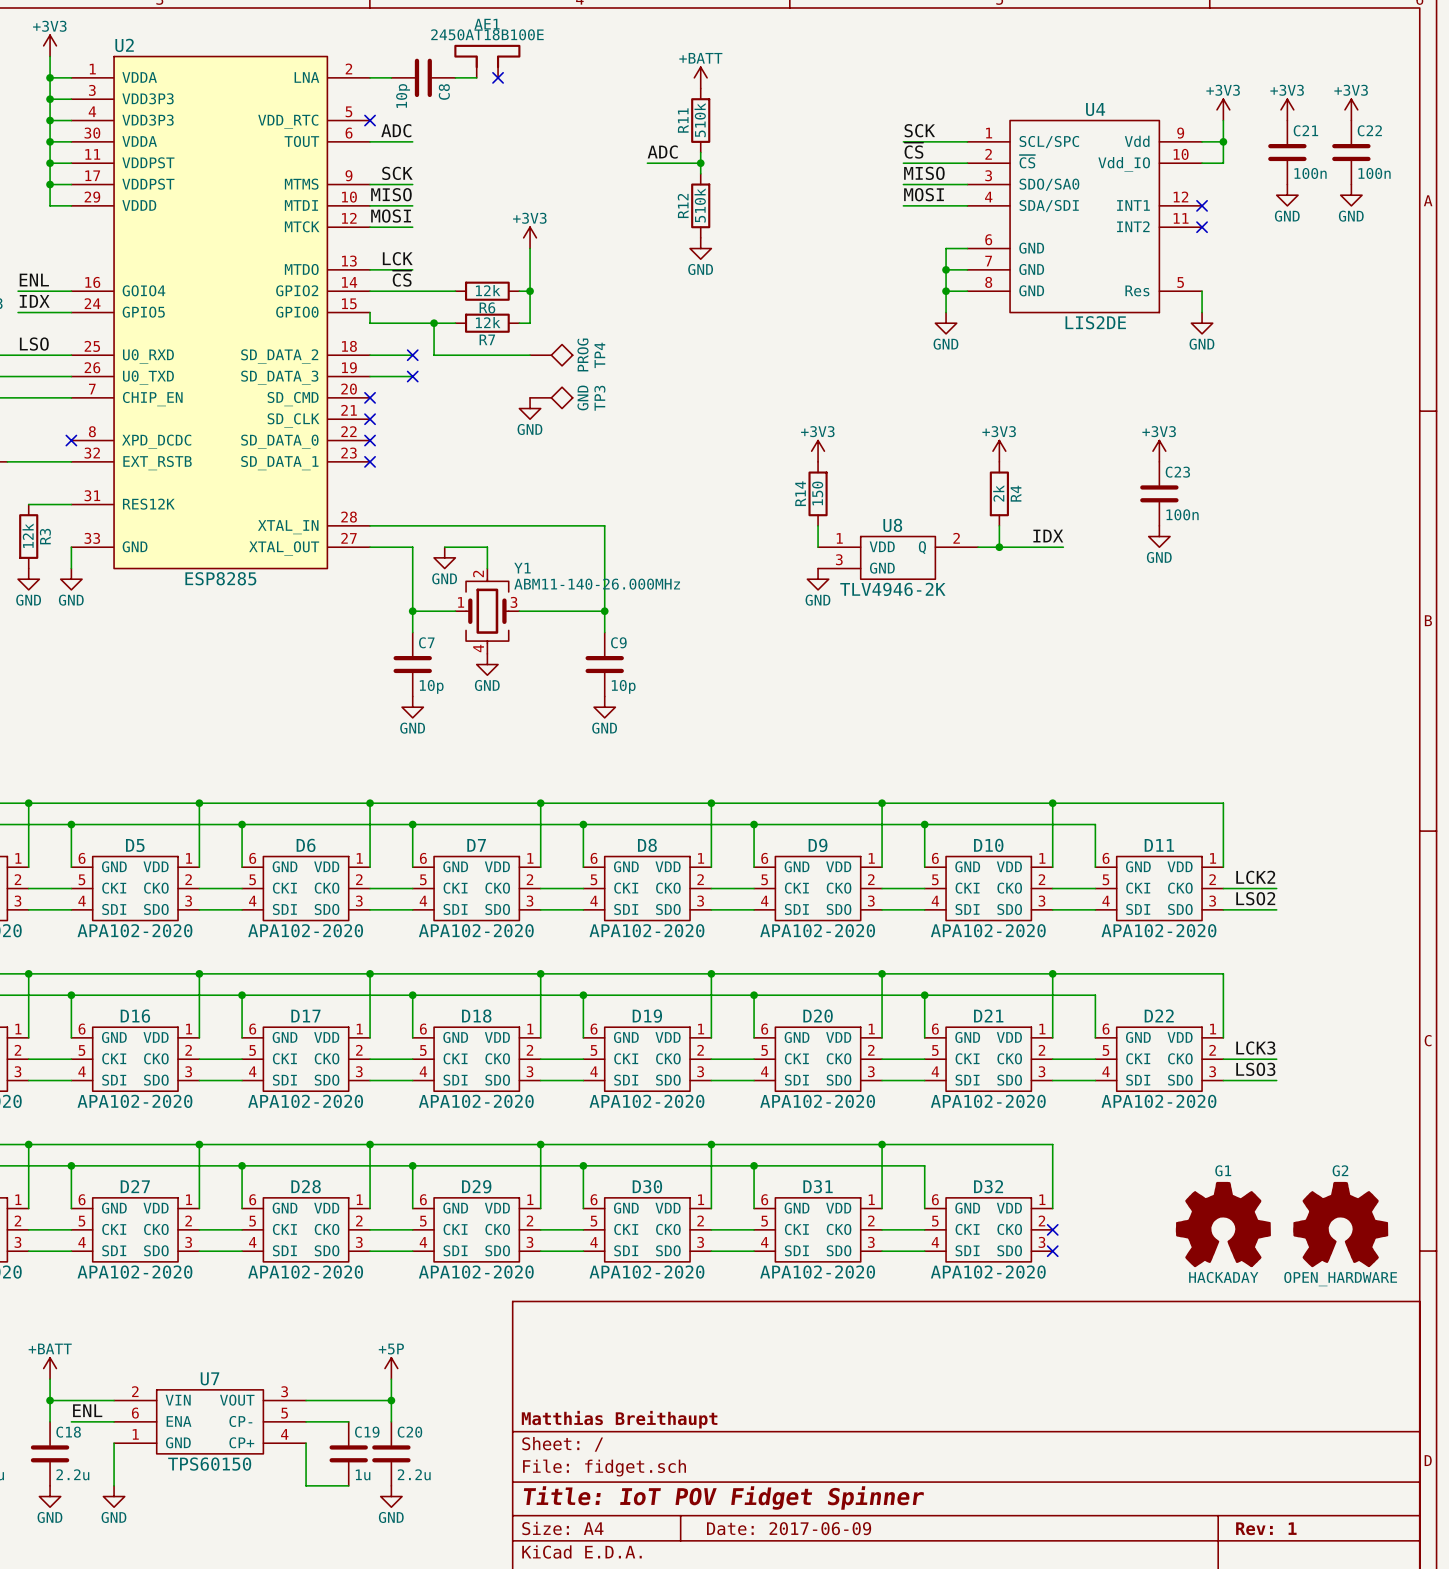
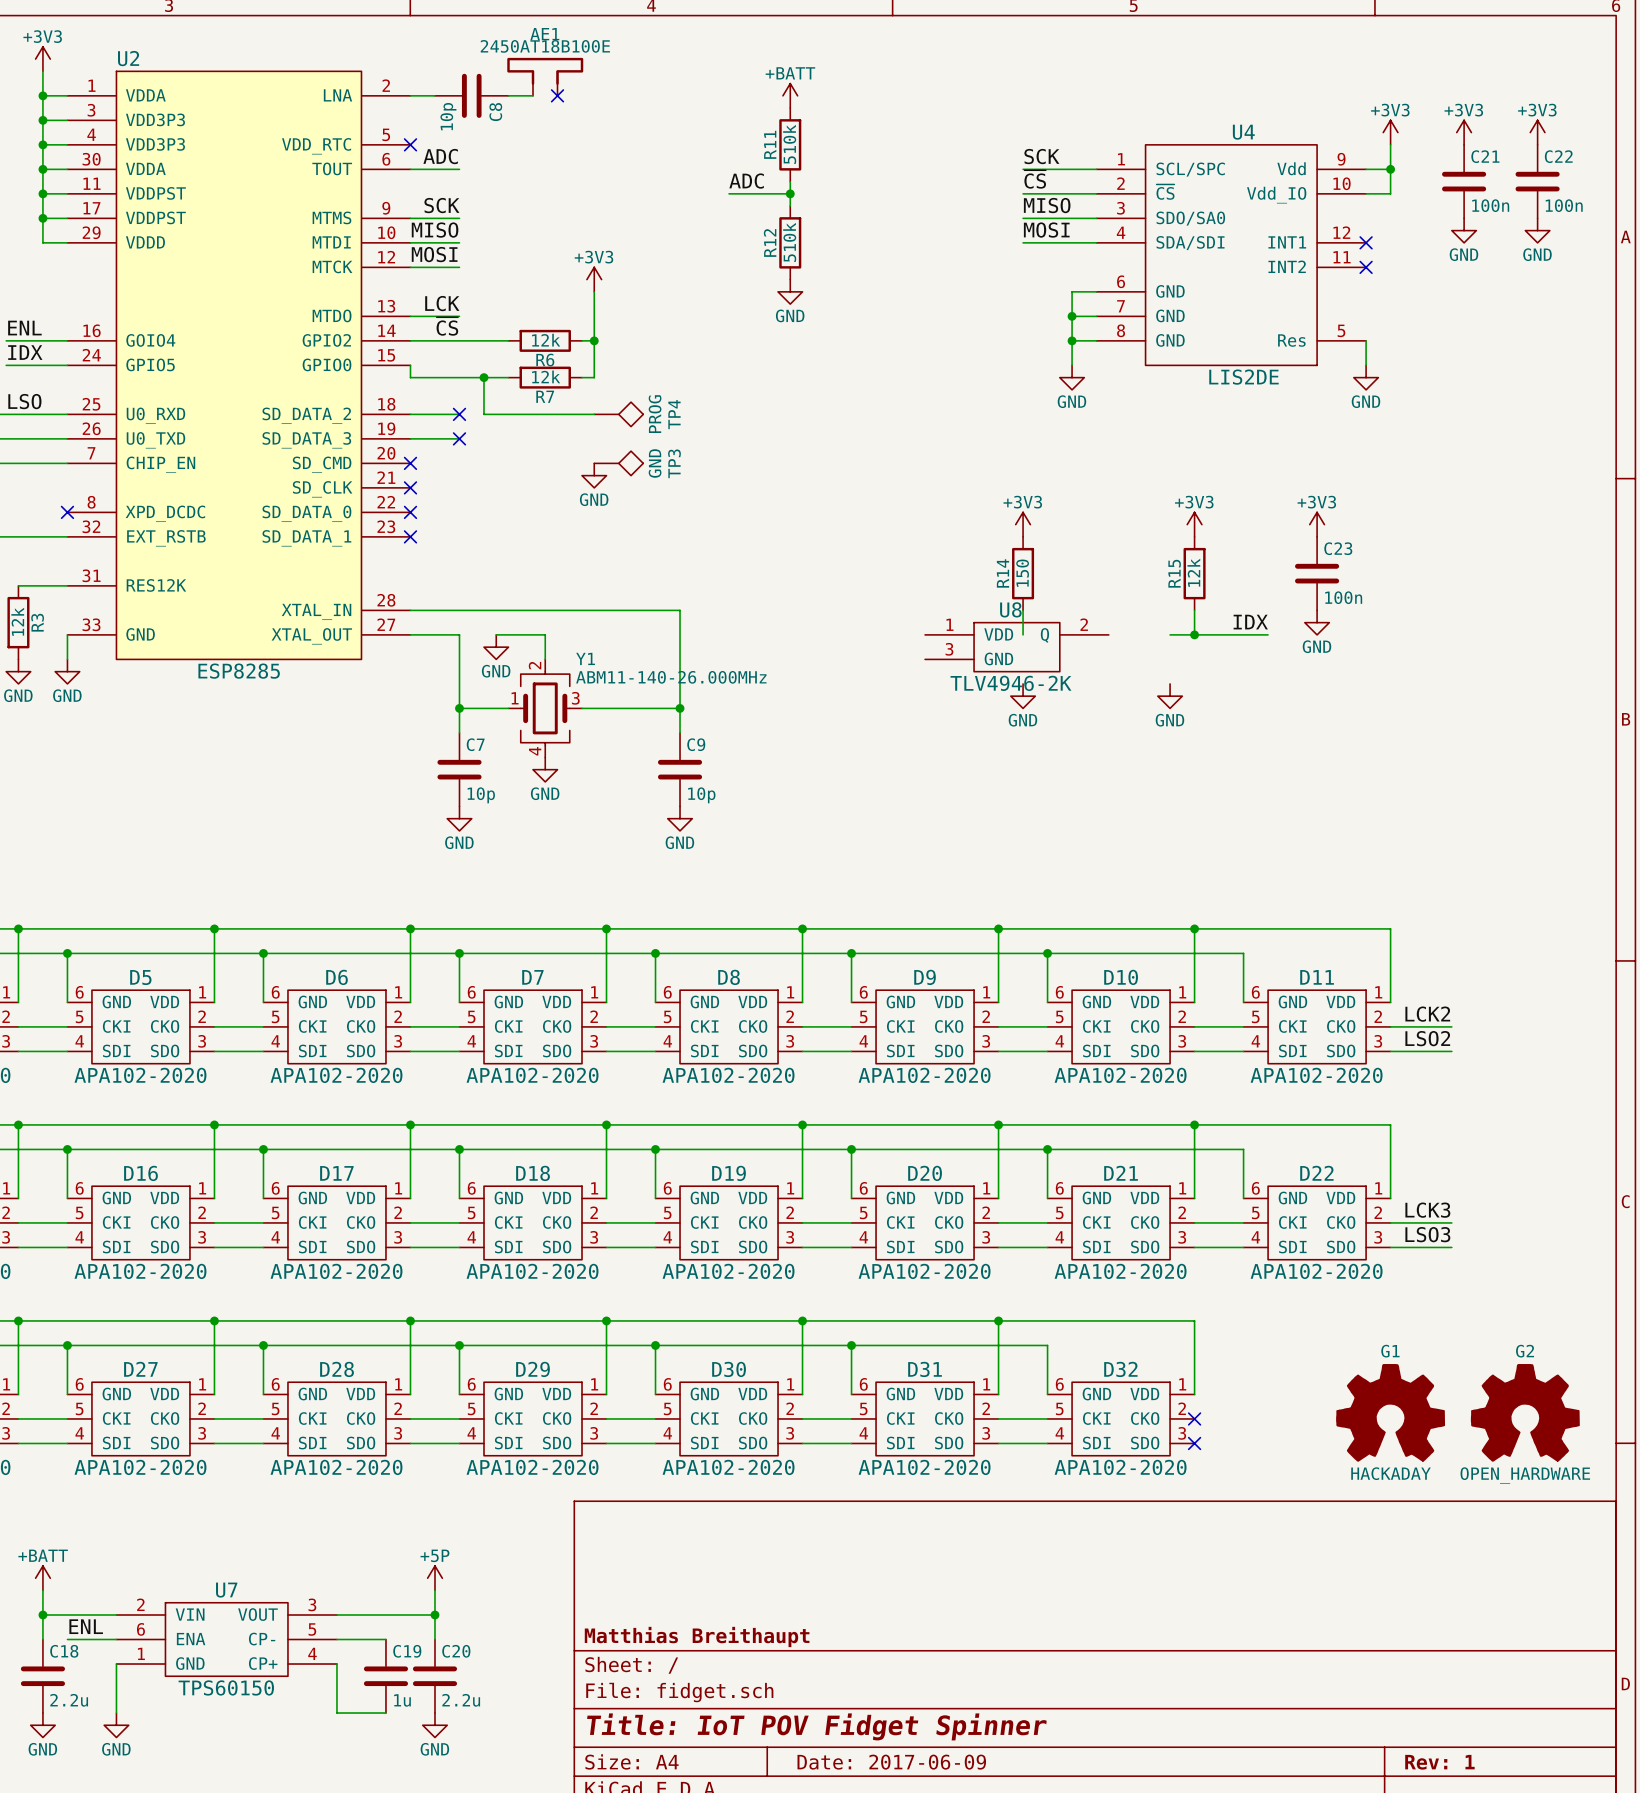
power symbol: +3V3 (818, 451) -> none
power symbol: none -> +3V3 (1023, 524)
power symbol: +3V3 (999, 451) -> none
power symbol: none -> +3V3 (1194, 524)
R14 position: (818, 493) -> (1023, 573)
R4: 2k (999, 493) -> none
R15: none -> 12k (1194, 573)
wire: (818, 525) (818, 547) -> (1023, 610) (1023, 634)
wire: (999, 525) (999, 547) -> (1194, 610) (1194, 634)
label position: IDX (1048, 536) -> IDX (1250, 622)
wire: (978, 547) (1031, 547) -> (1206, 634) (1268, 634)
junction: (999, 547) -> none
junction: none -> (1194, 634)
power symbol position: GND (818, 579) -> GND (1023, 696)
power symbol: none -> GND (1170, 696)

